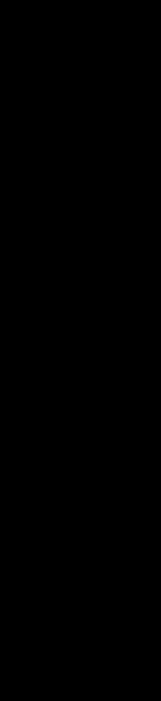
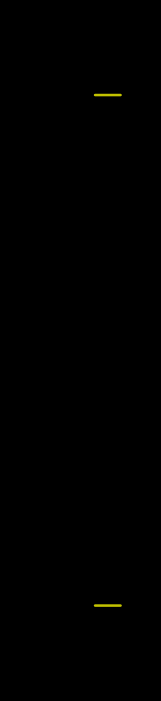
board edge: none -> (120, 95) (95, 95)
board edge: none -> (120, 605) (95, 605)

